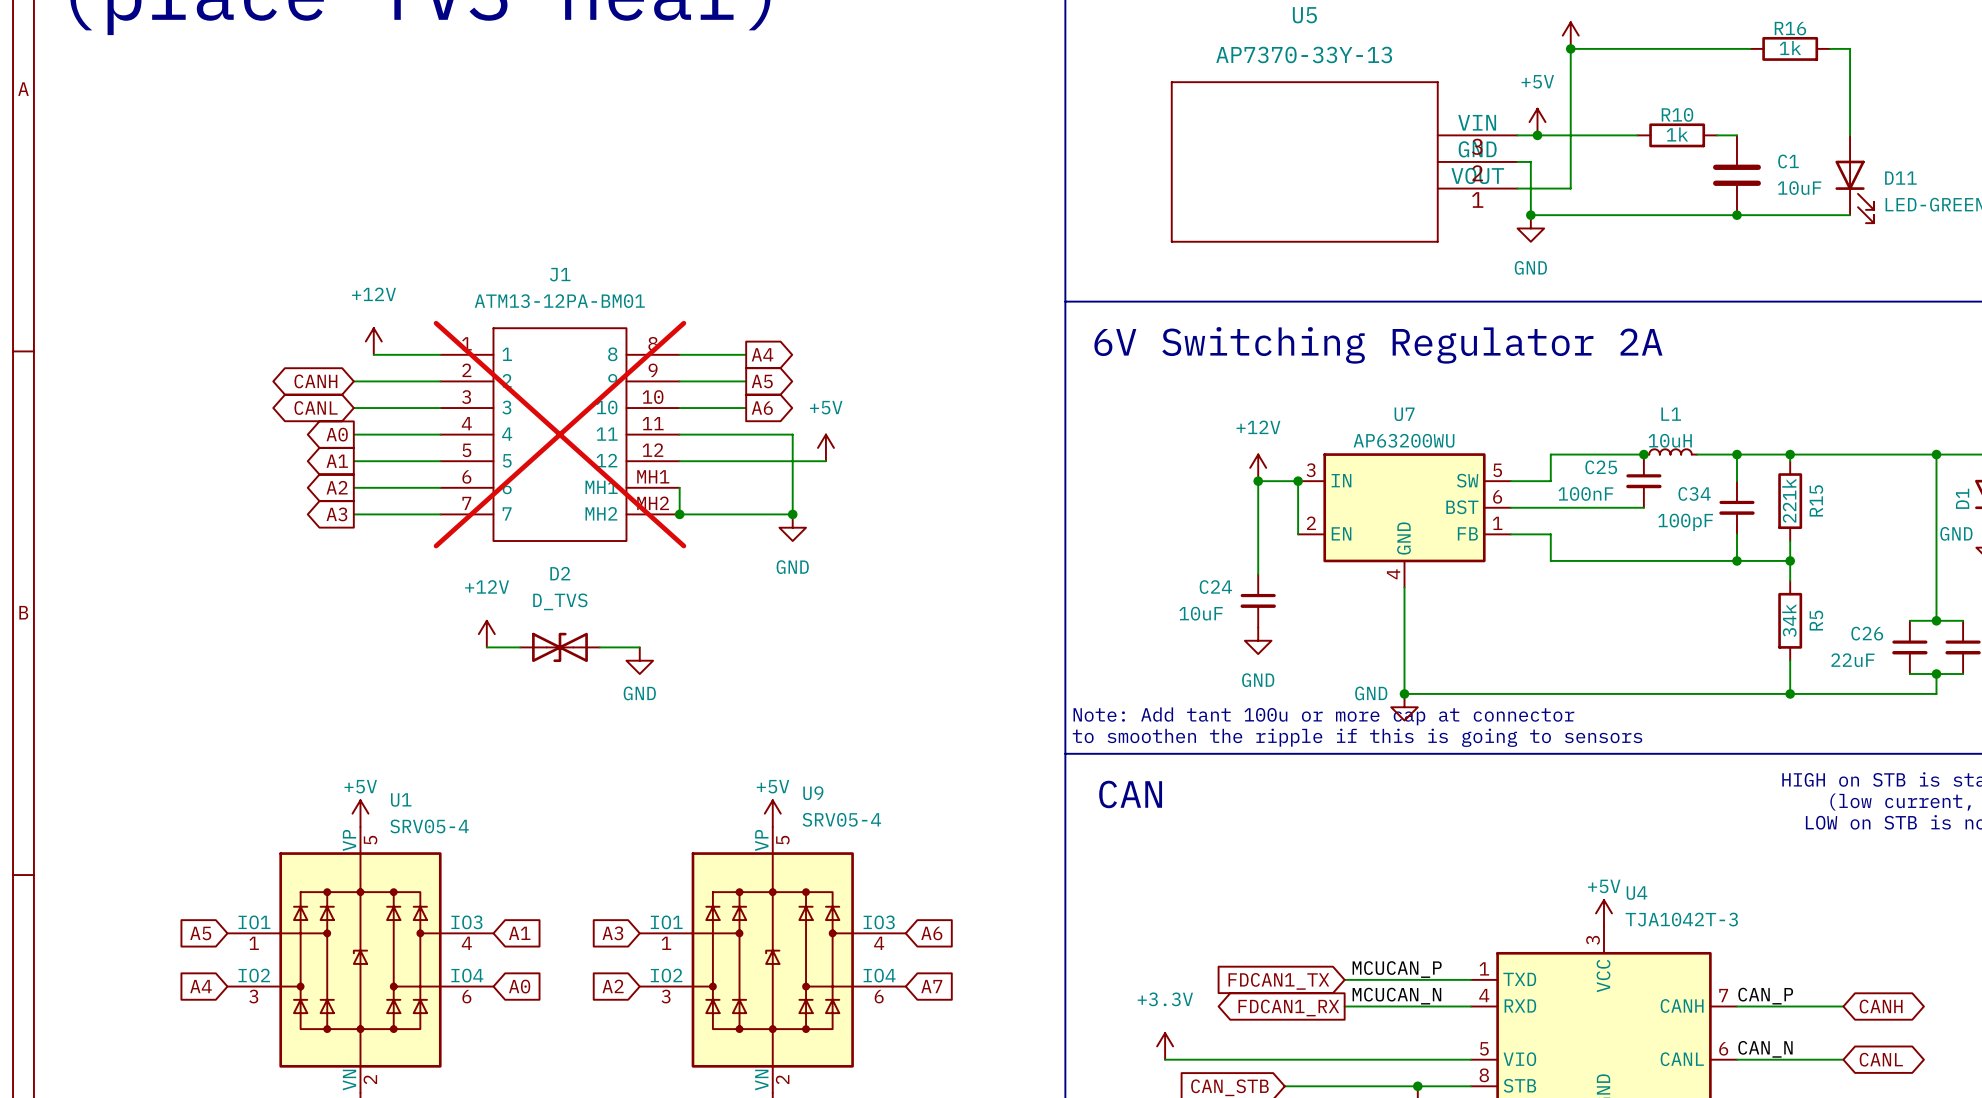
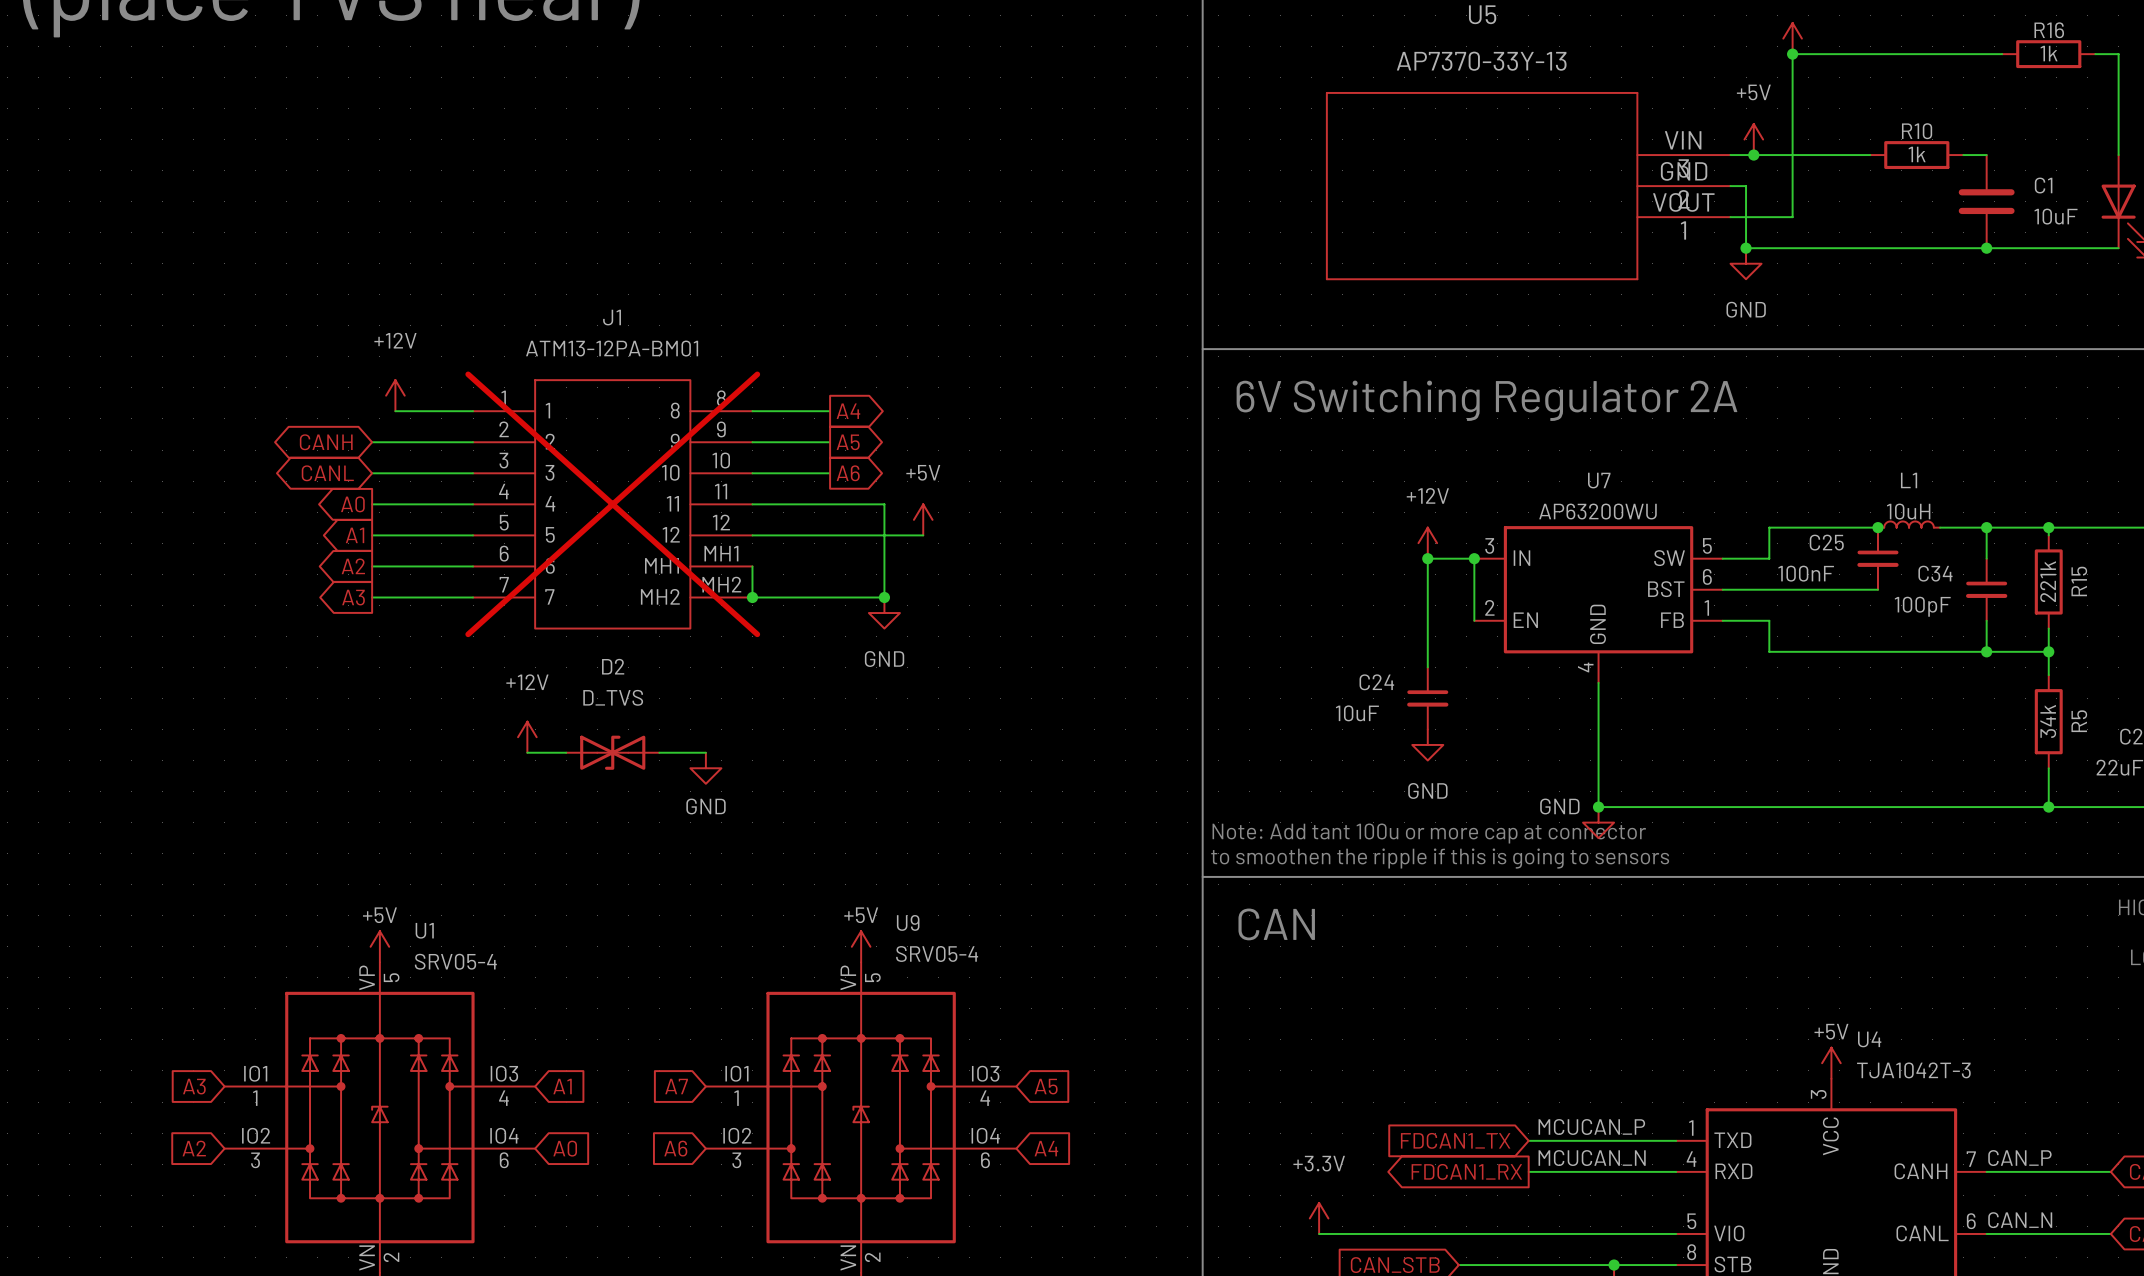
global label: A5 (200, 933) -> A3 (194, 1086)
global label: A3 (612, 933) -> A7 (676, 1086)
global label: A6 (931, 933) -> A5 (1046, 1086)
global label: A4 (201, 986) -> A2 (194, 1148)
global label: A2 (613, 986) -> A6 (675, 1148)
global label: A7 (931, 986) -> A4 (1046, 1148)

